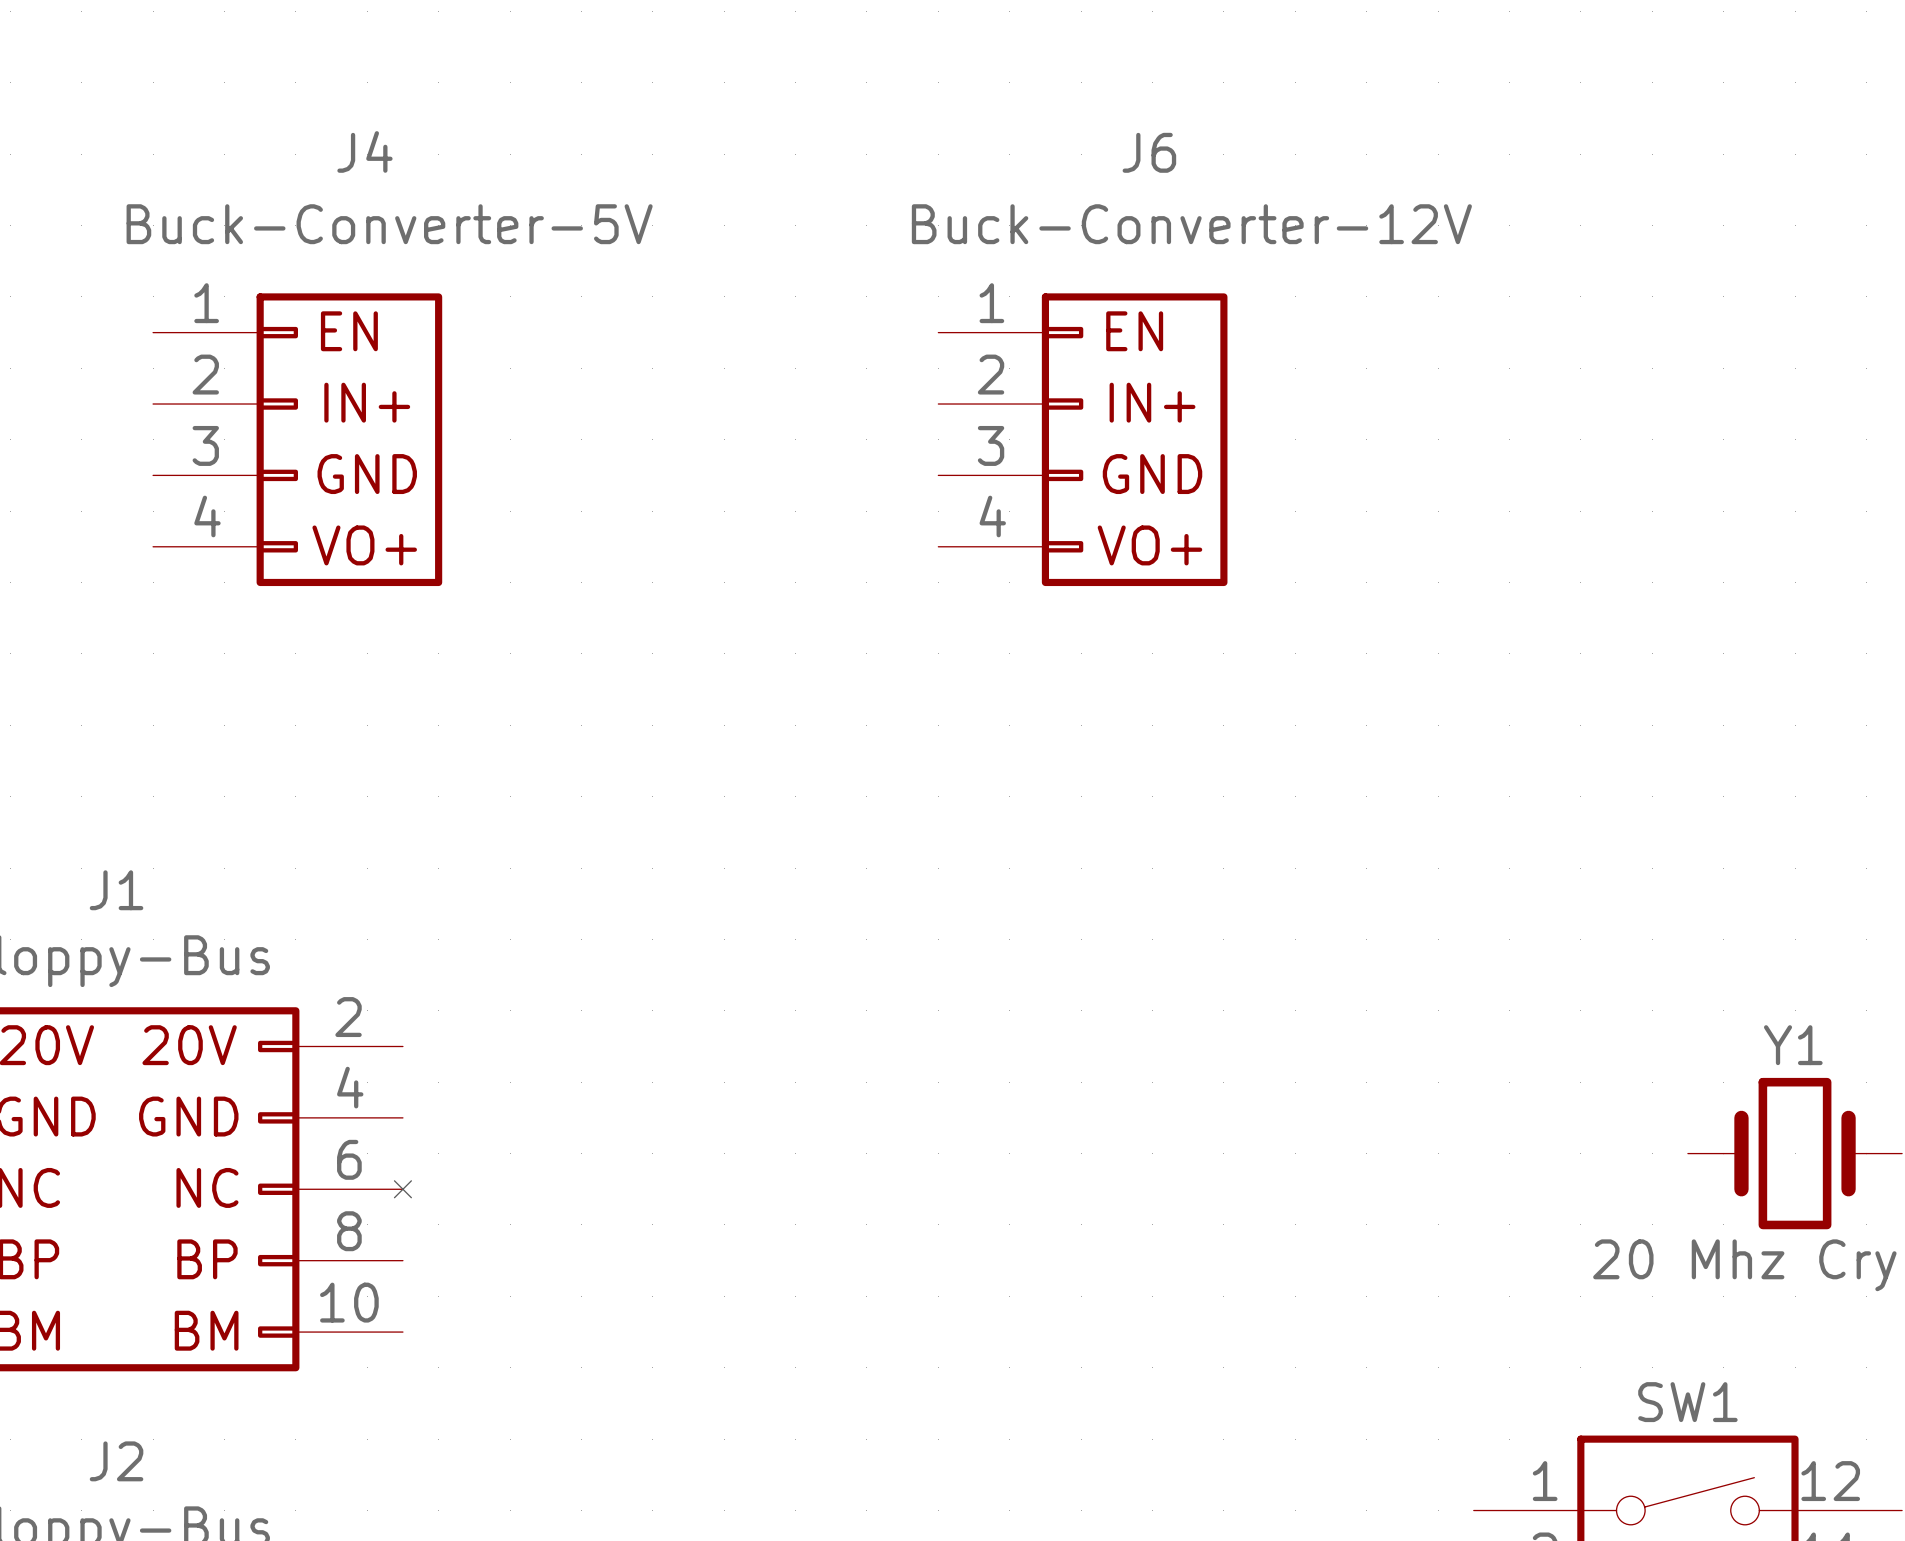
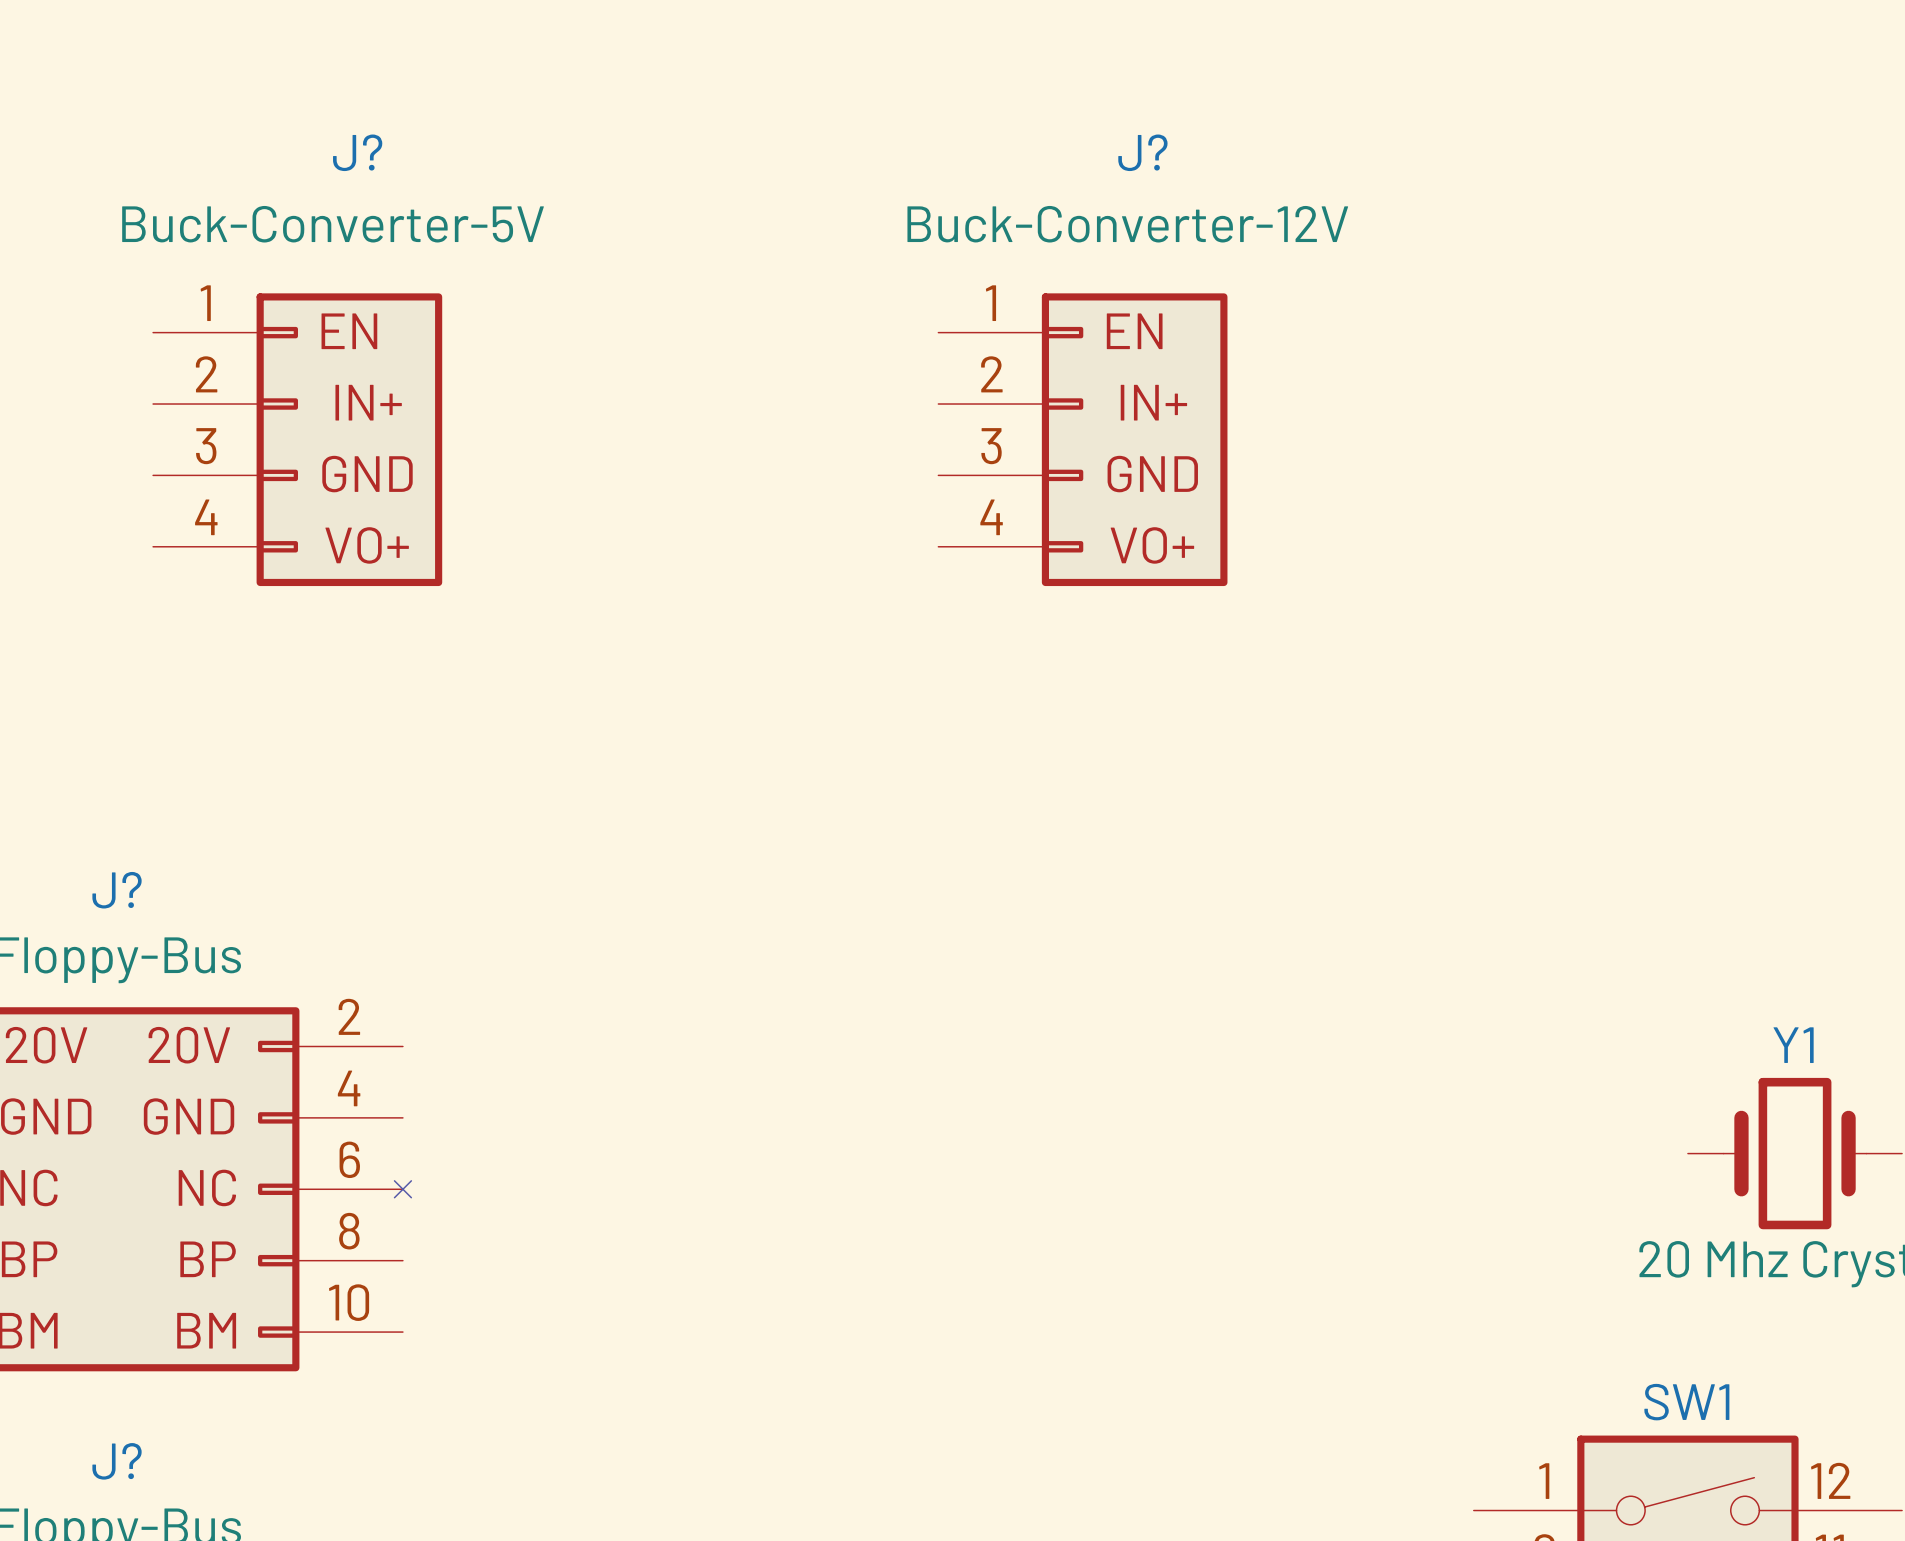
J4 name: J4 (364, 151) -> J? (357, 152)
J6 name: J6 (1149, 152) -> J? (1142, 152)
J1 name: J1 (116, 890) -> J? (117, 890)
J2 name: J2 (116, 1461) -> J? (117, 1461)

